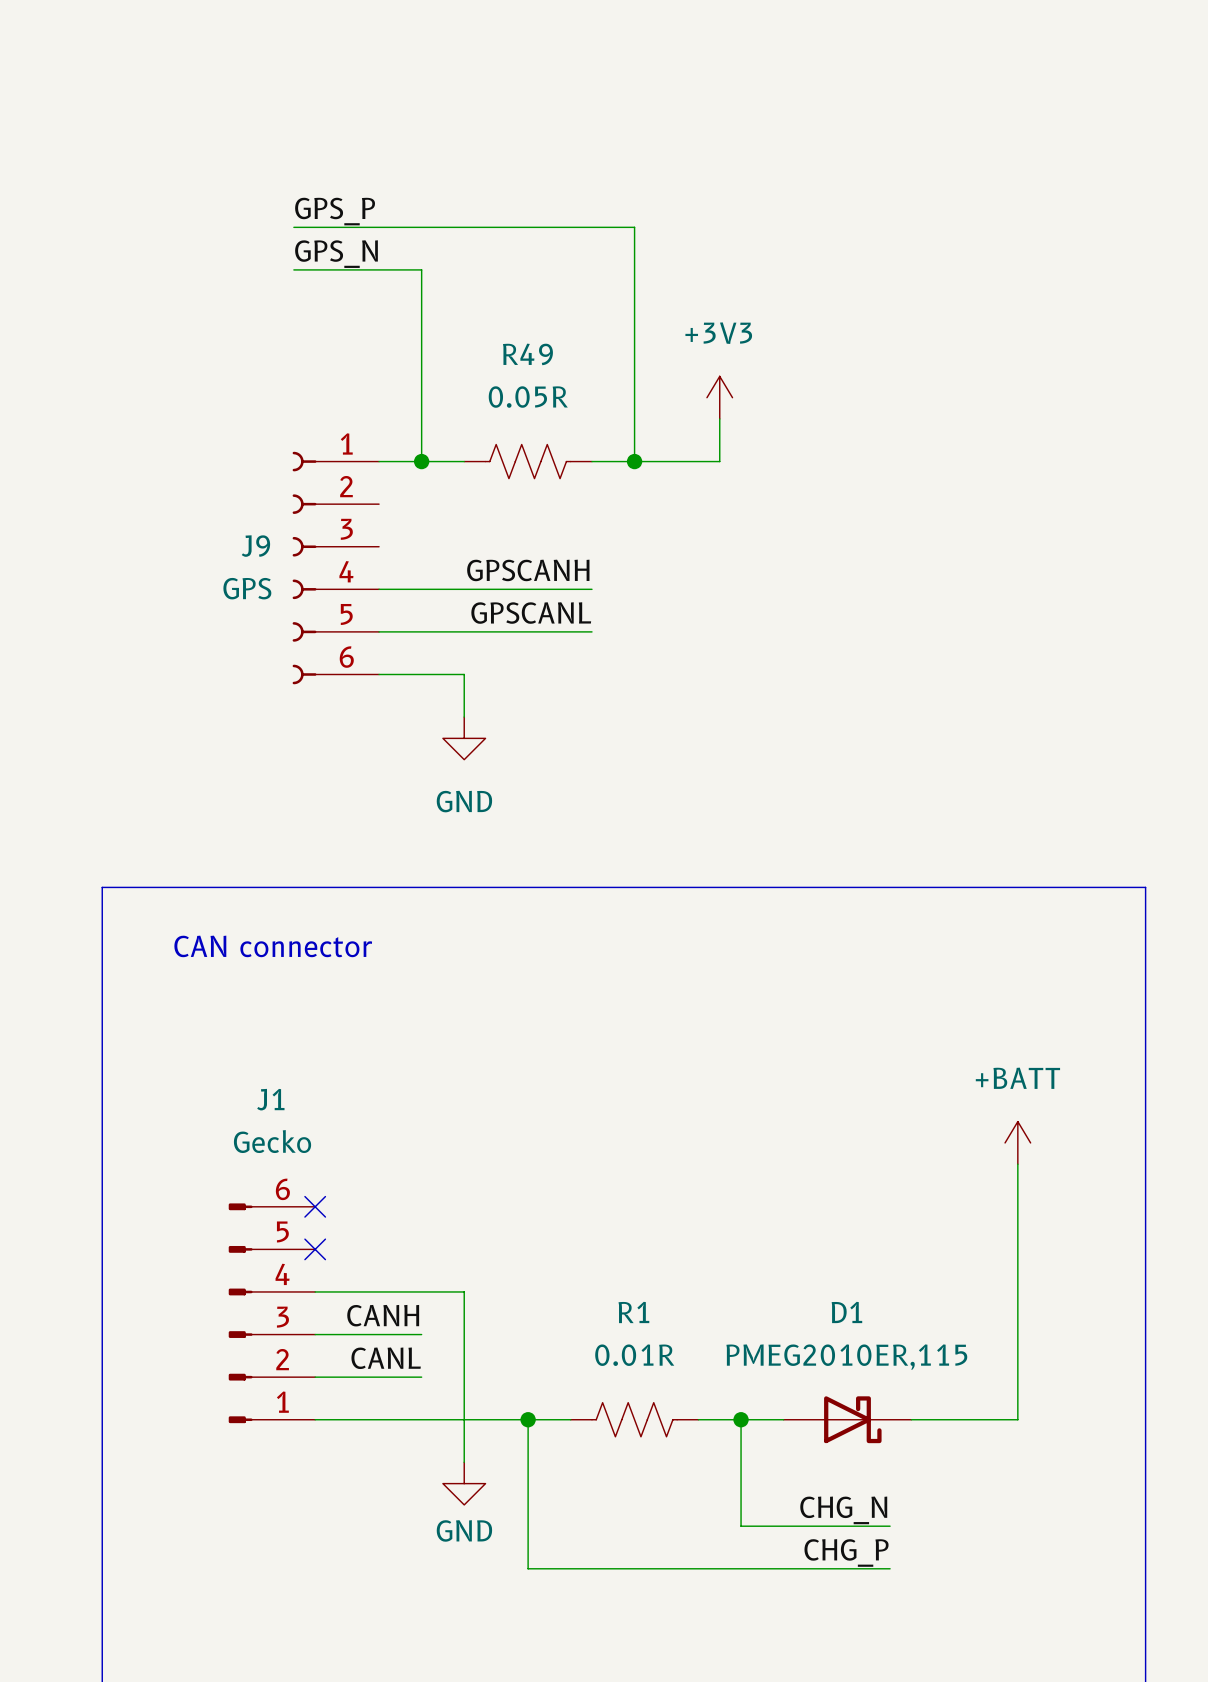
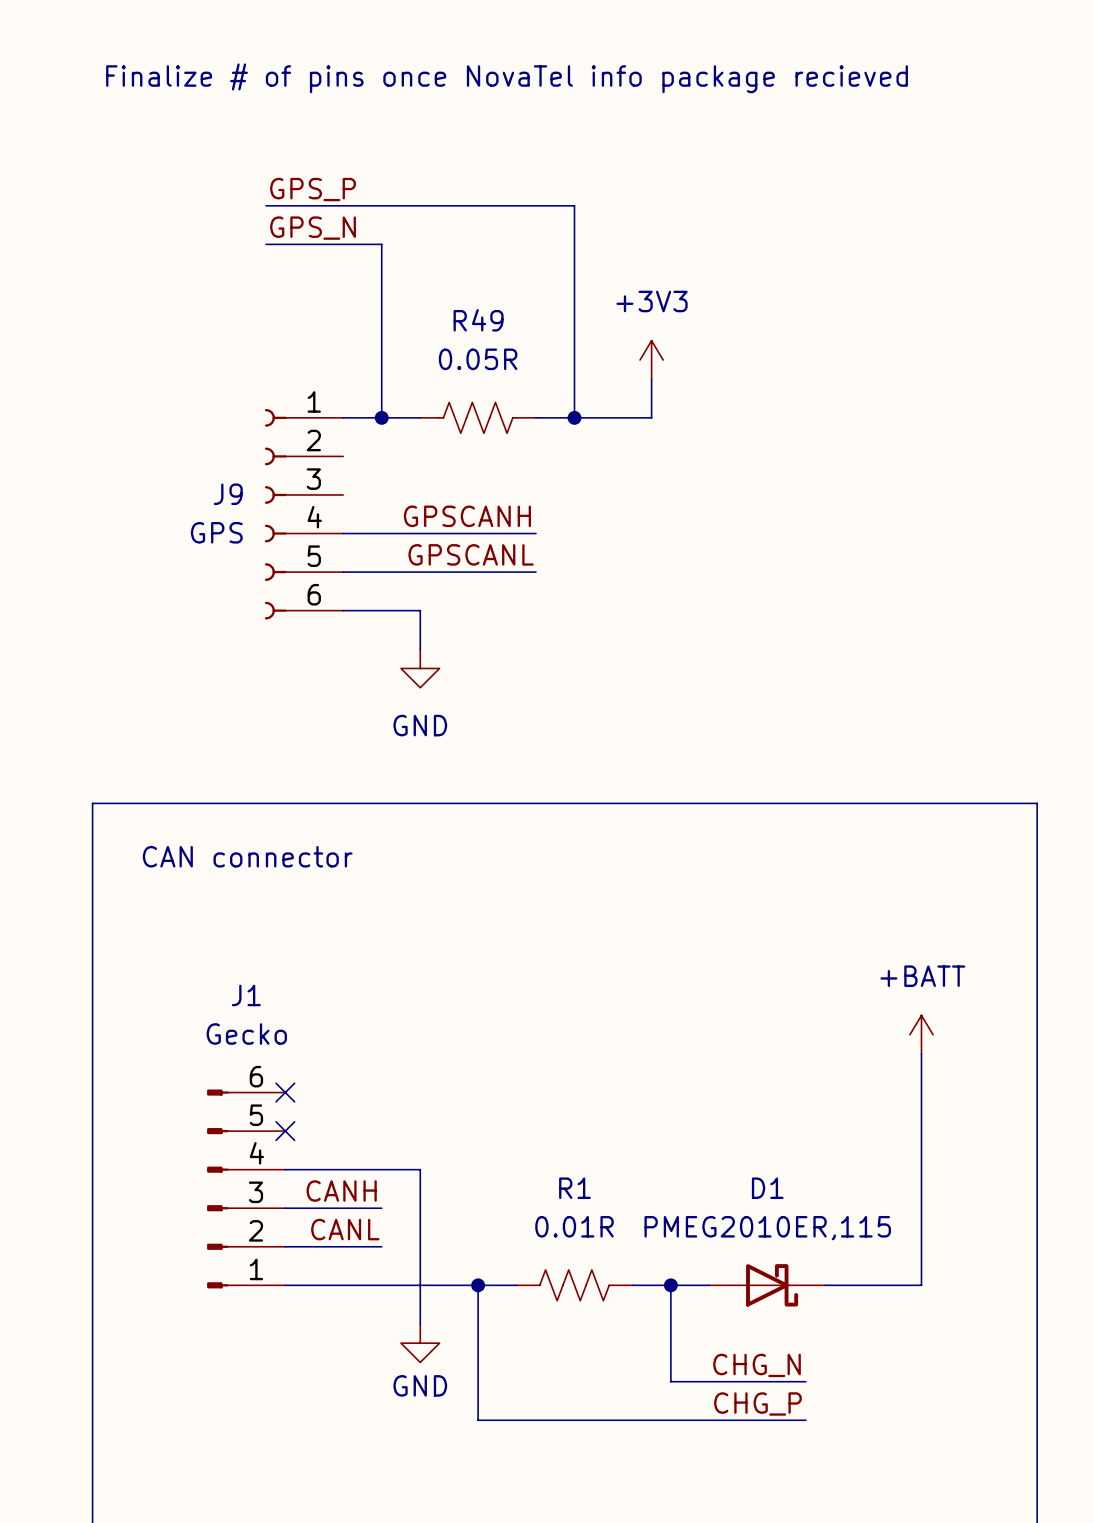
text: none -> Finalize # of pins once NovaTel info package recieved (507, 78)

